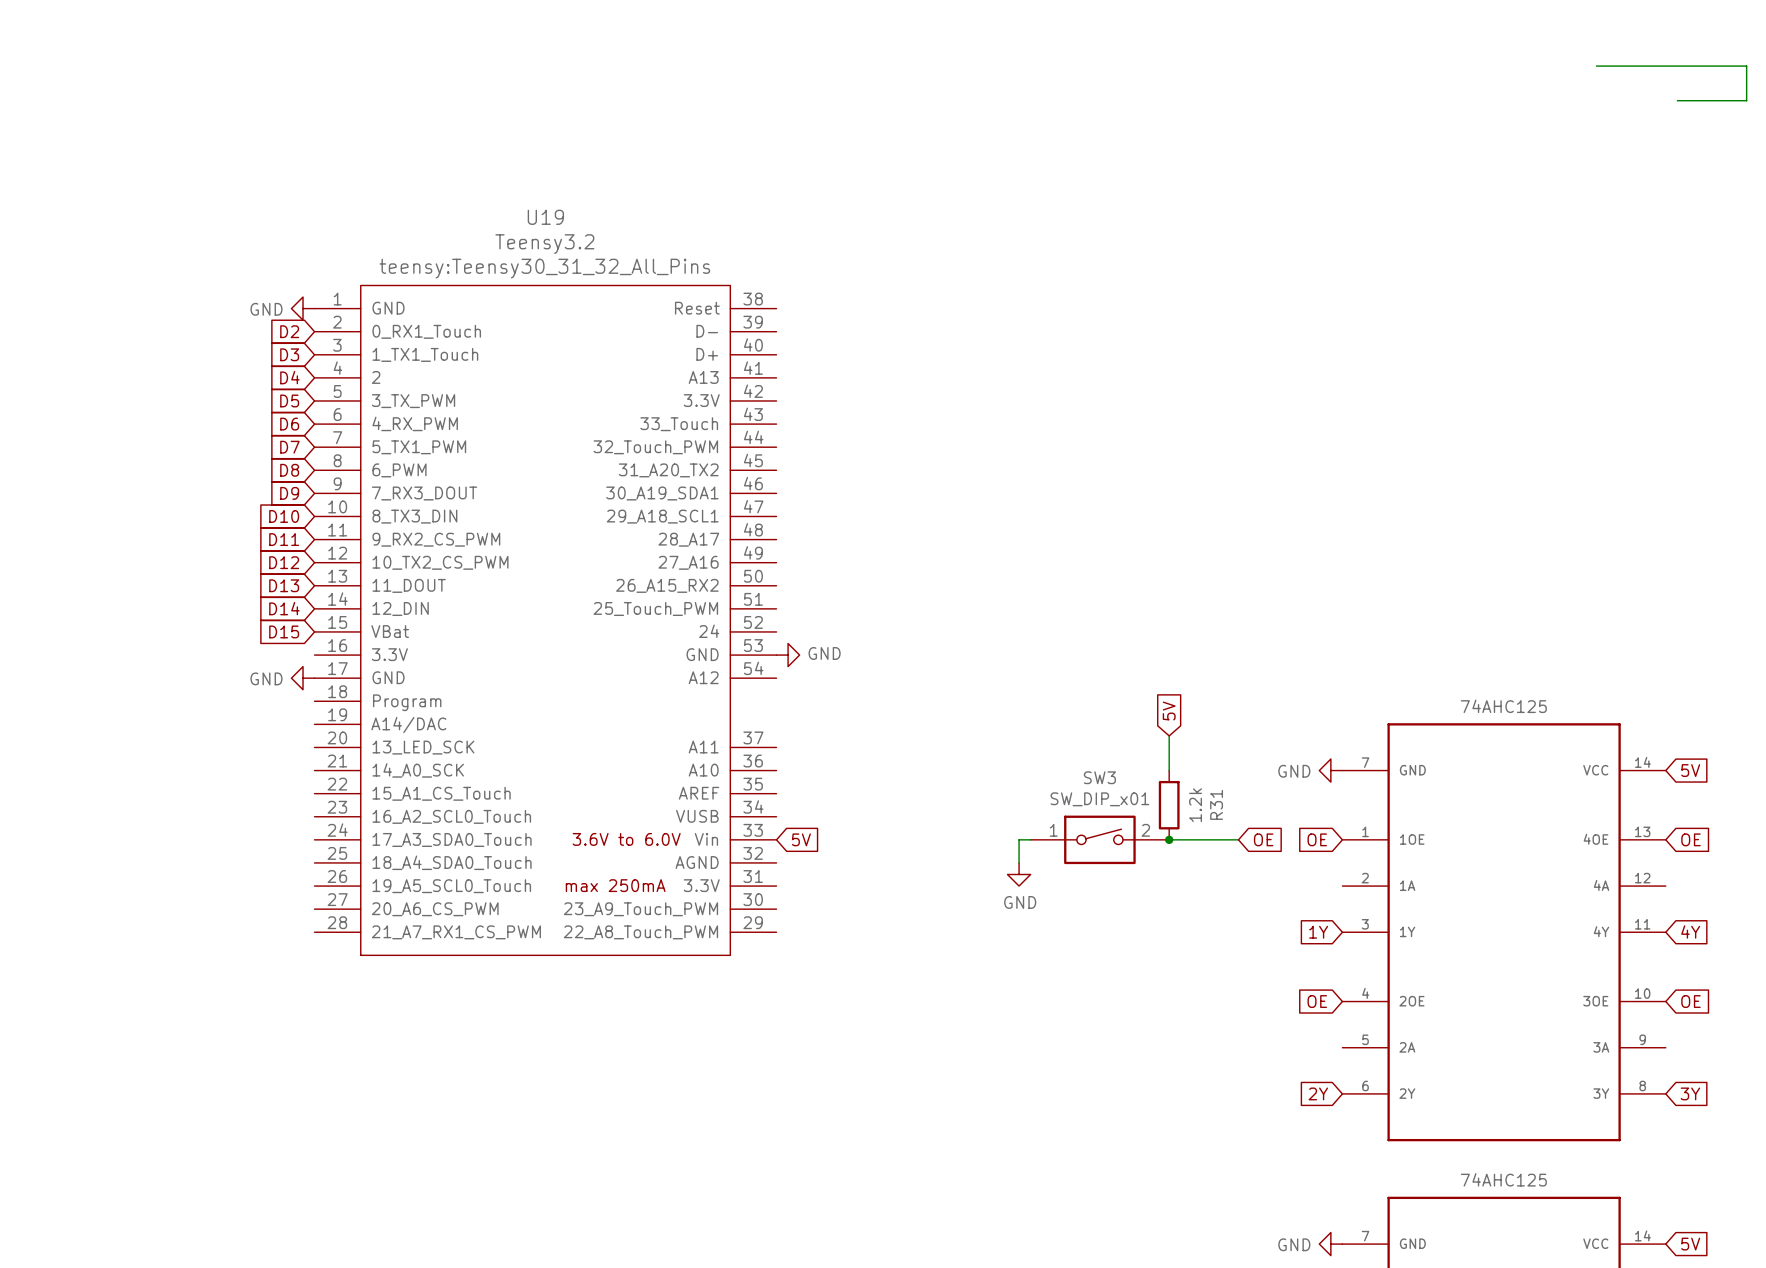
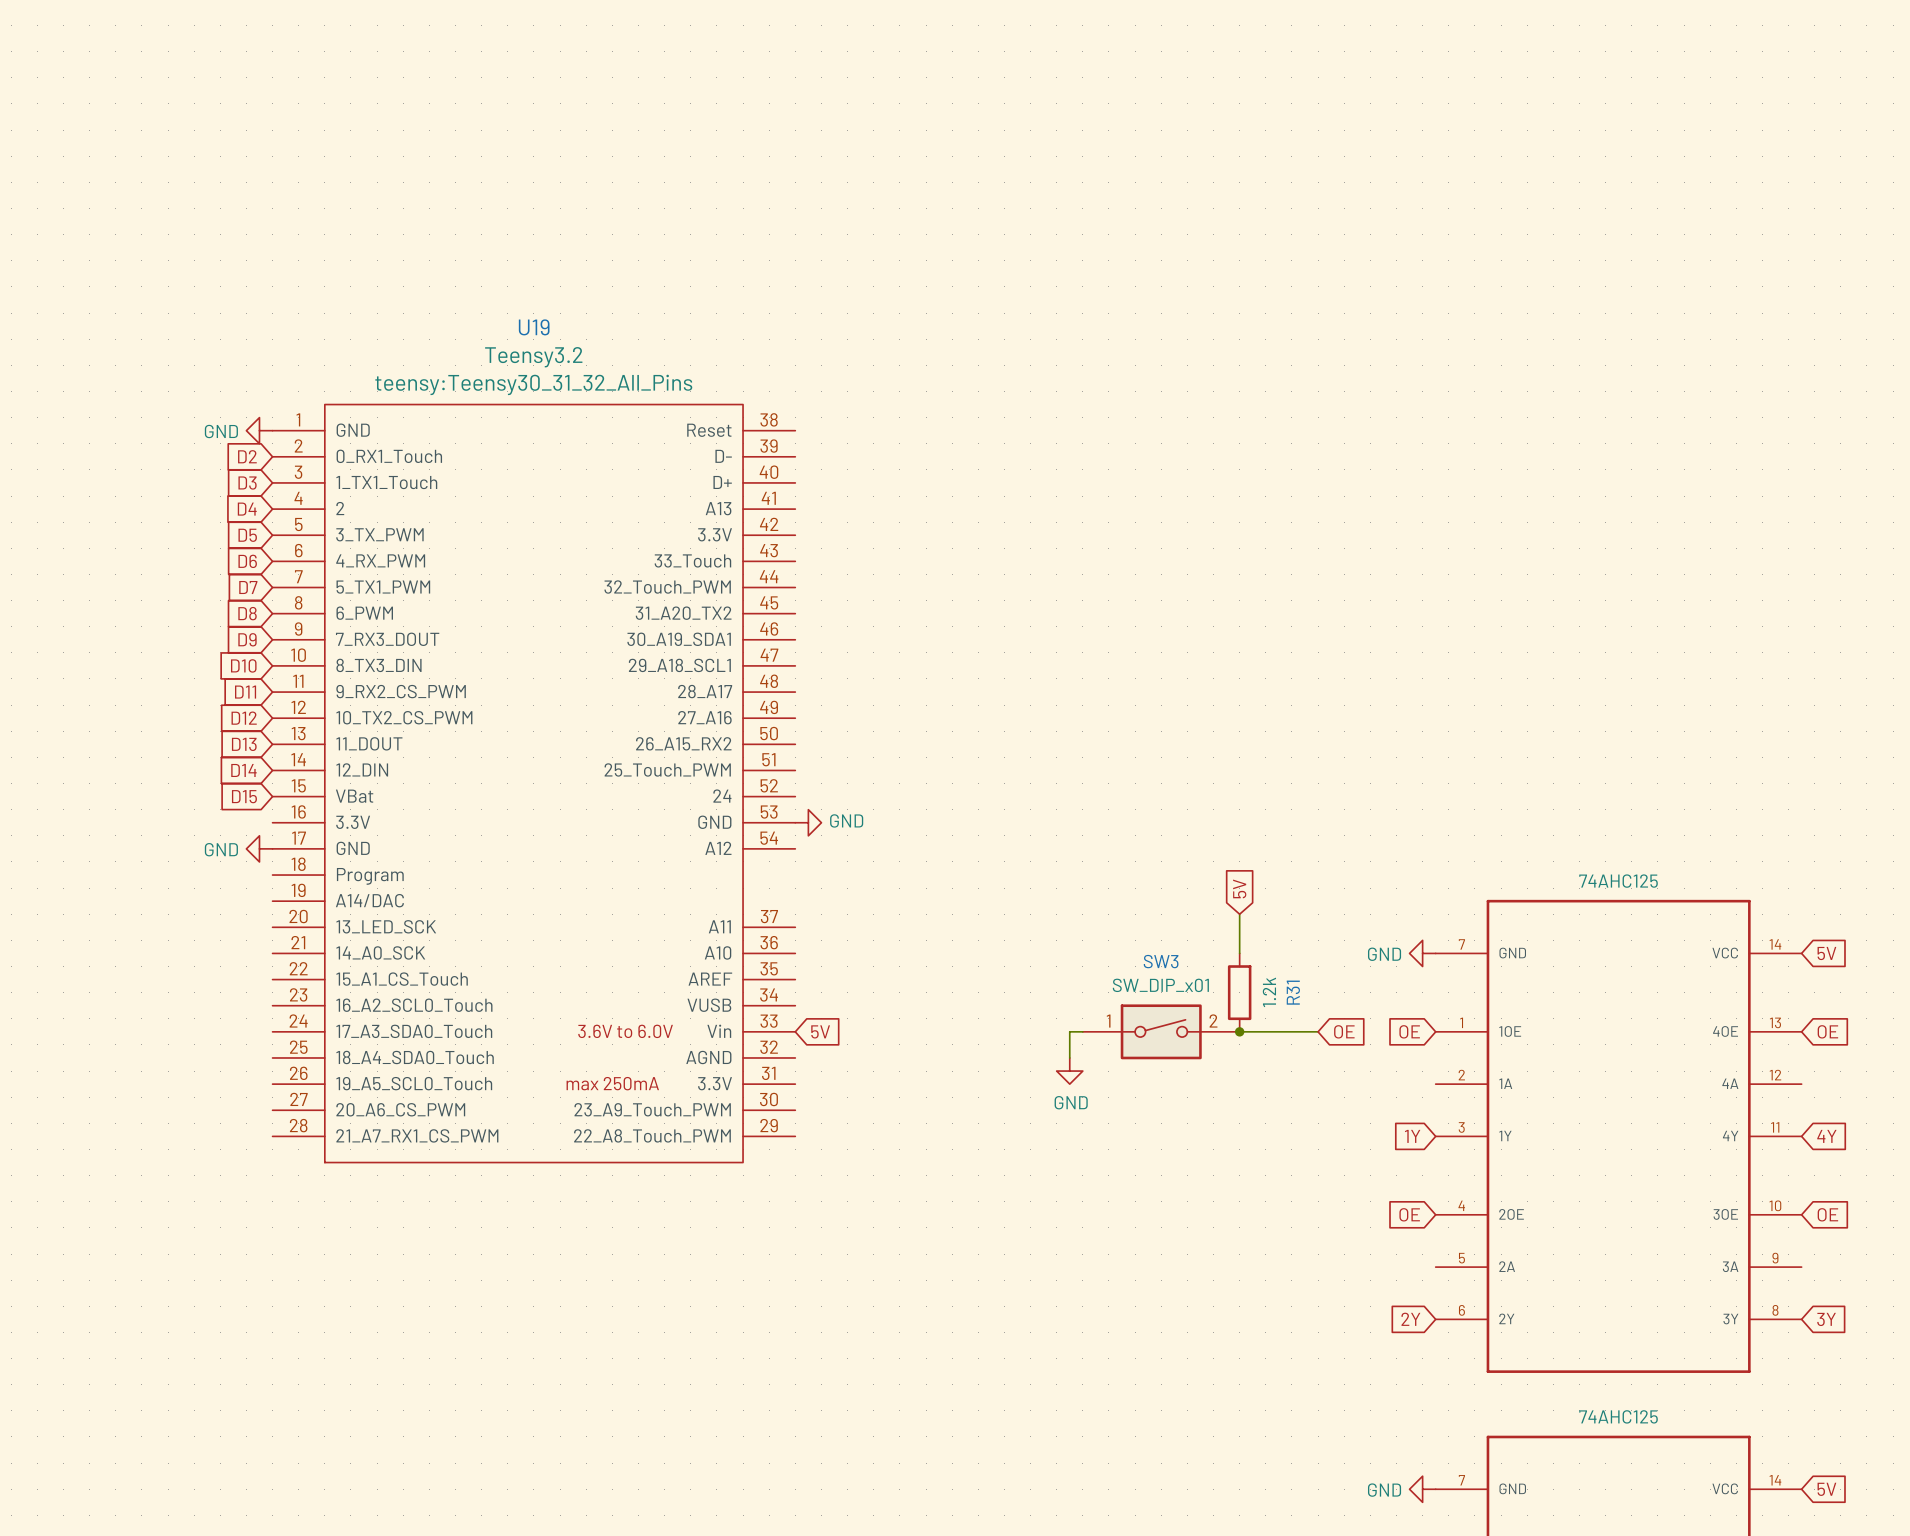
wire: (1596, 66) (1746, 66) (1746, 100) (1677, 100) -> none

